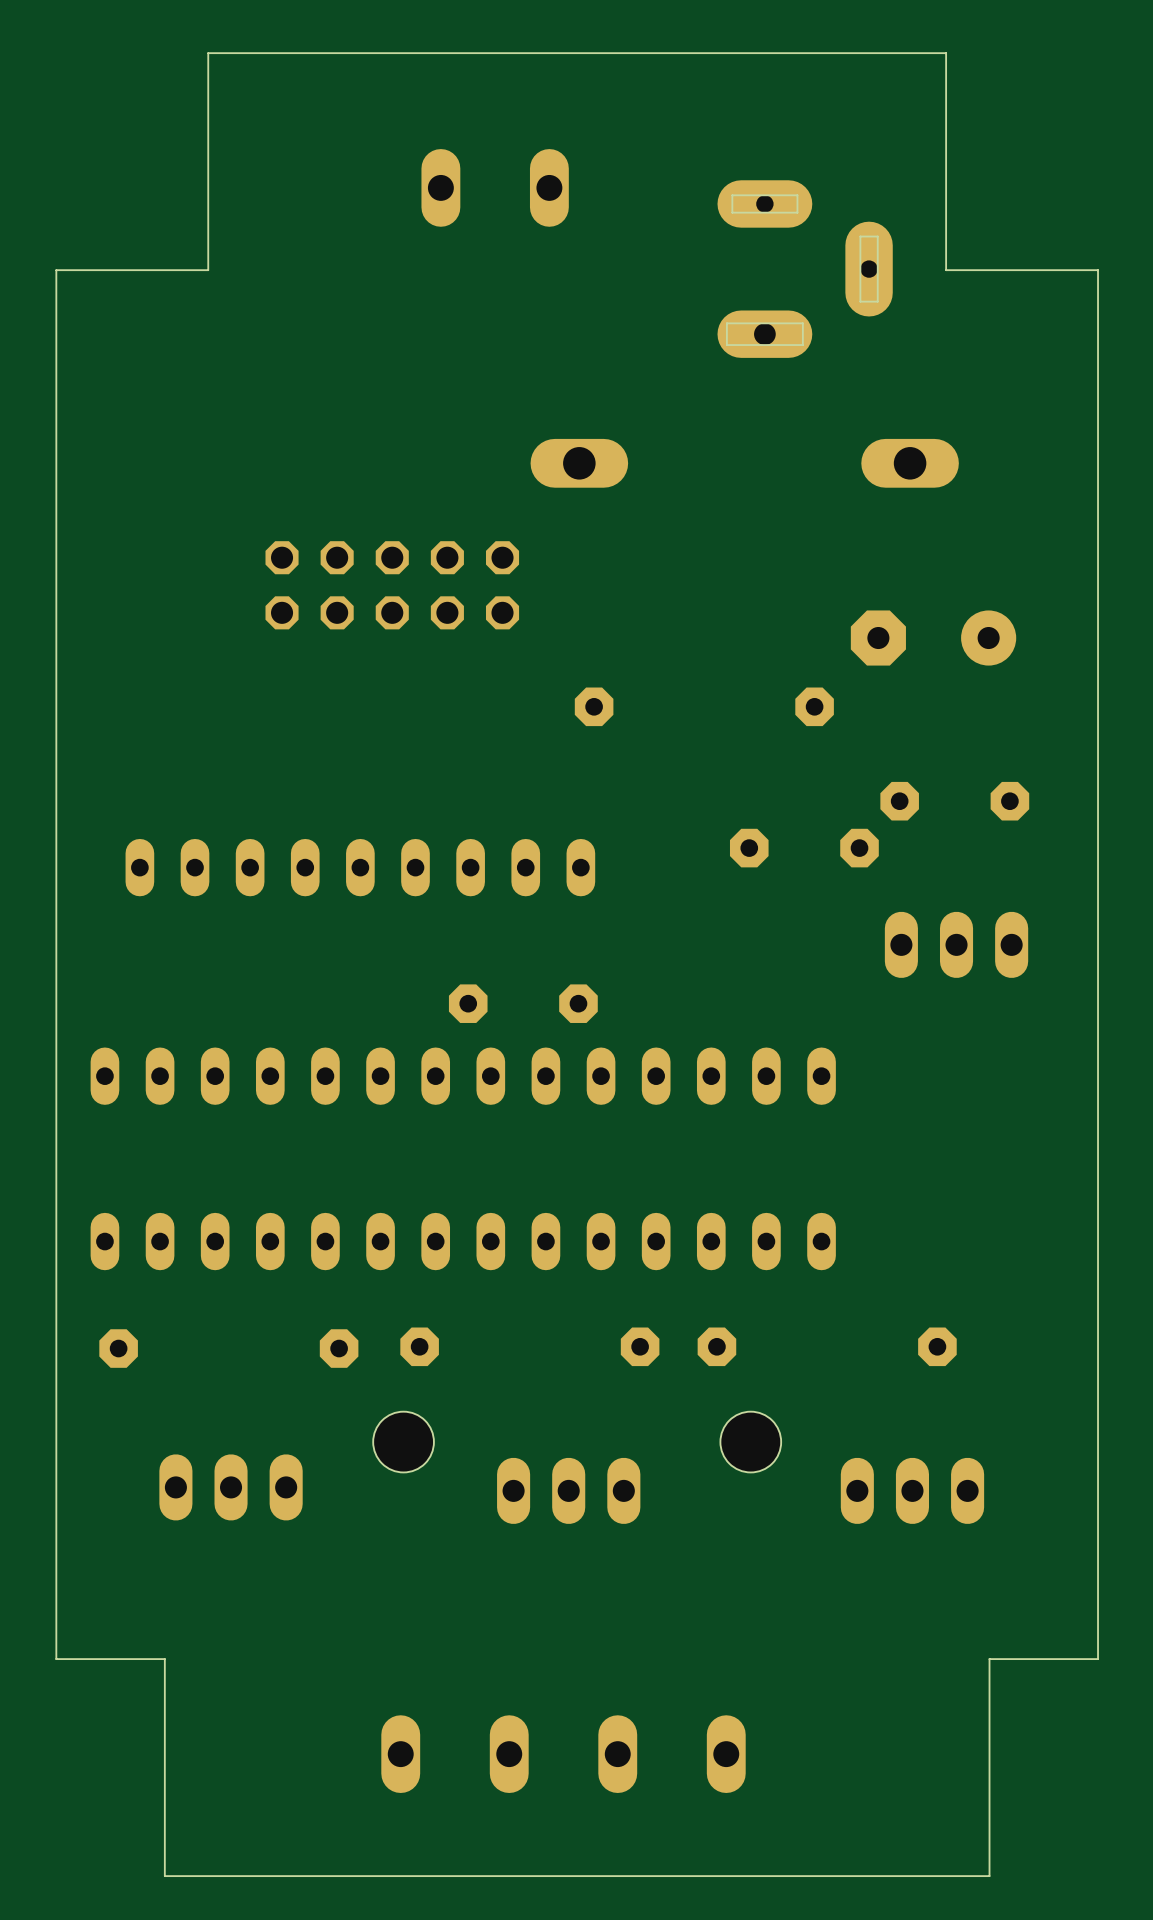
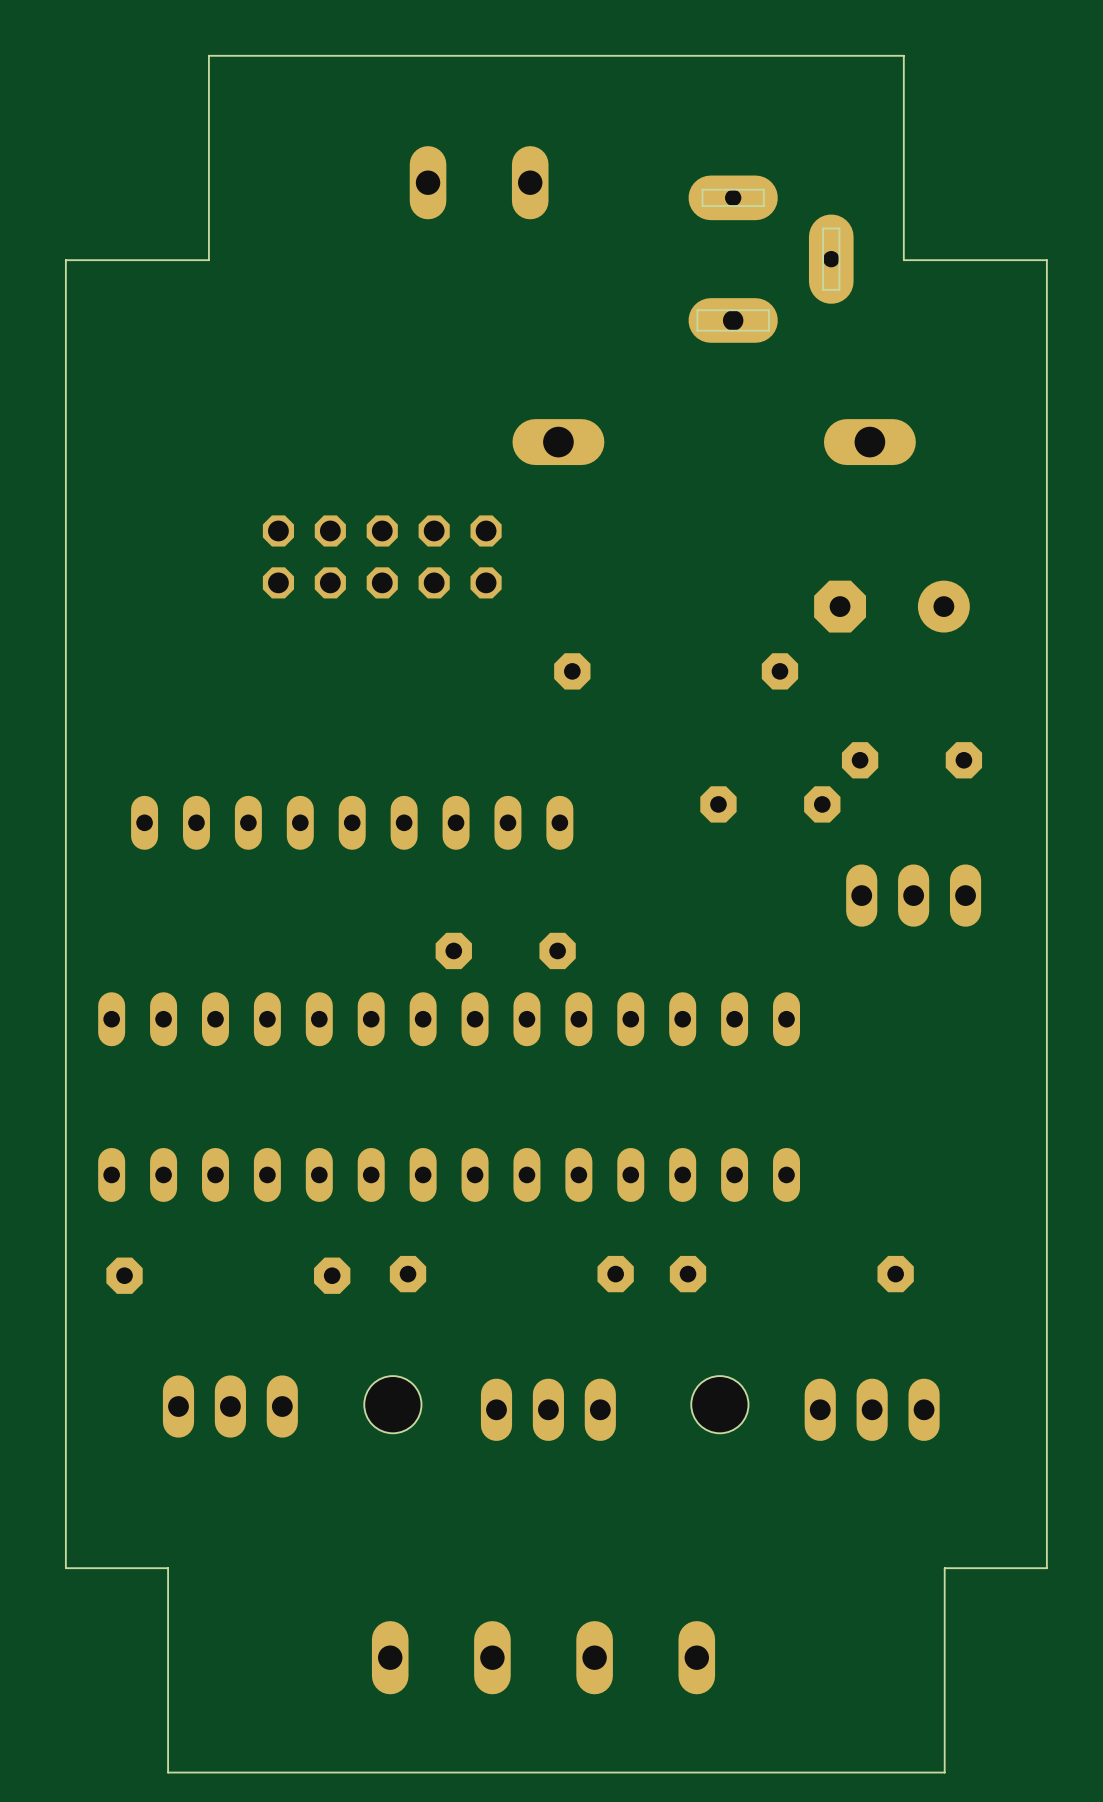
hole position: (403, 1442) -> (392, 1404)
hole position: (750, 1442) -> (719, 1404)

